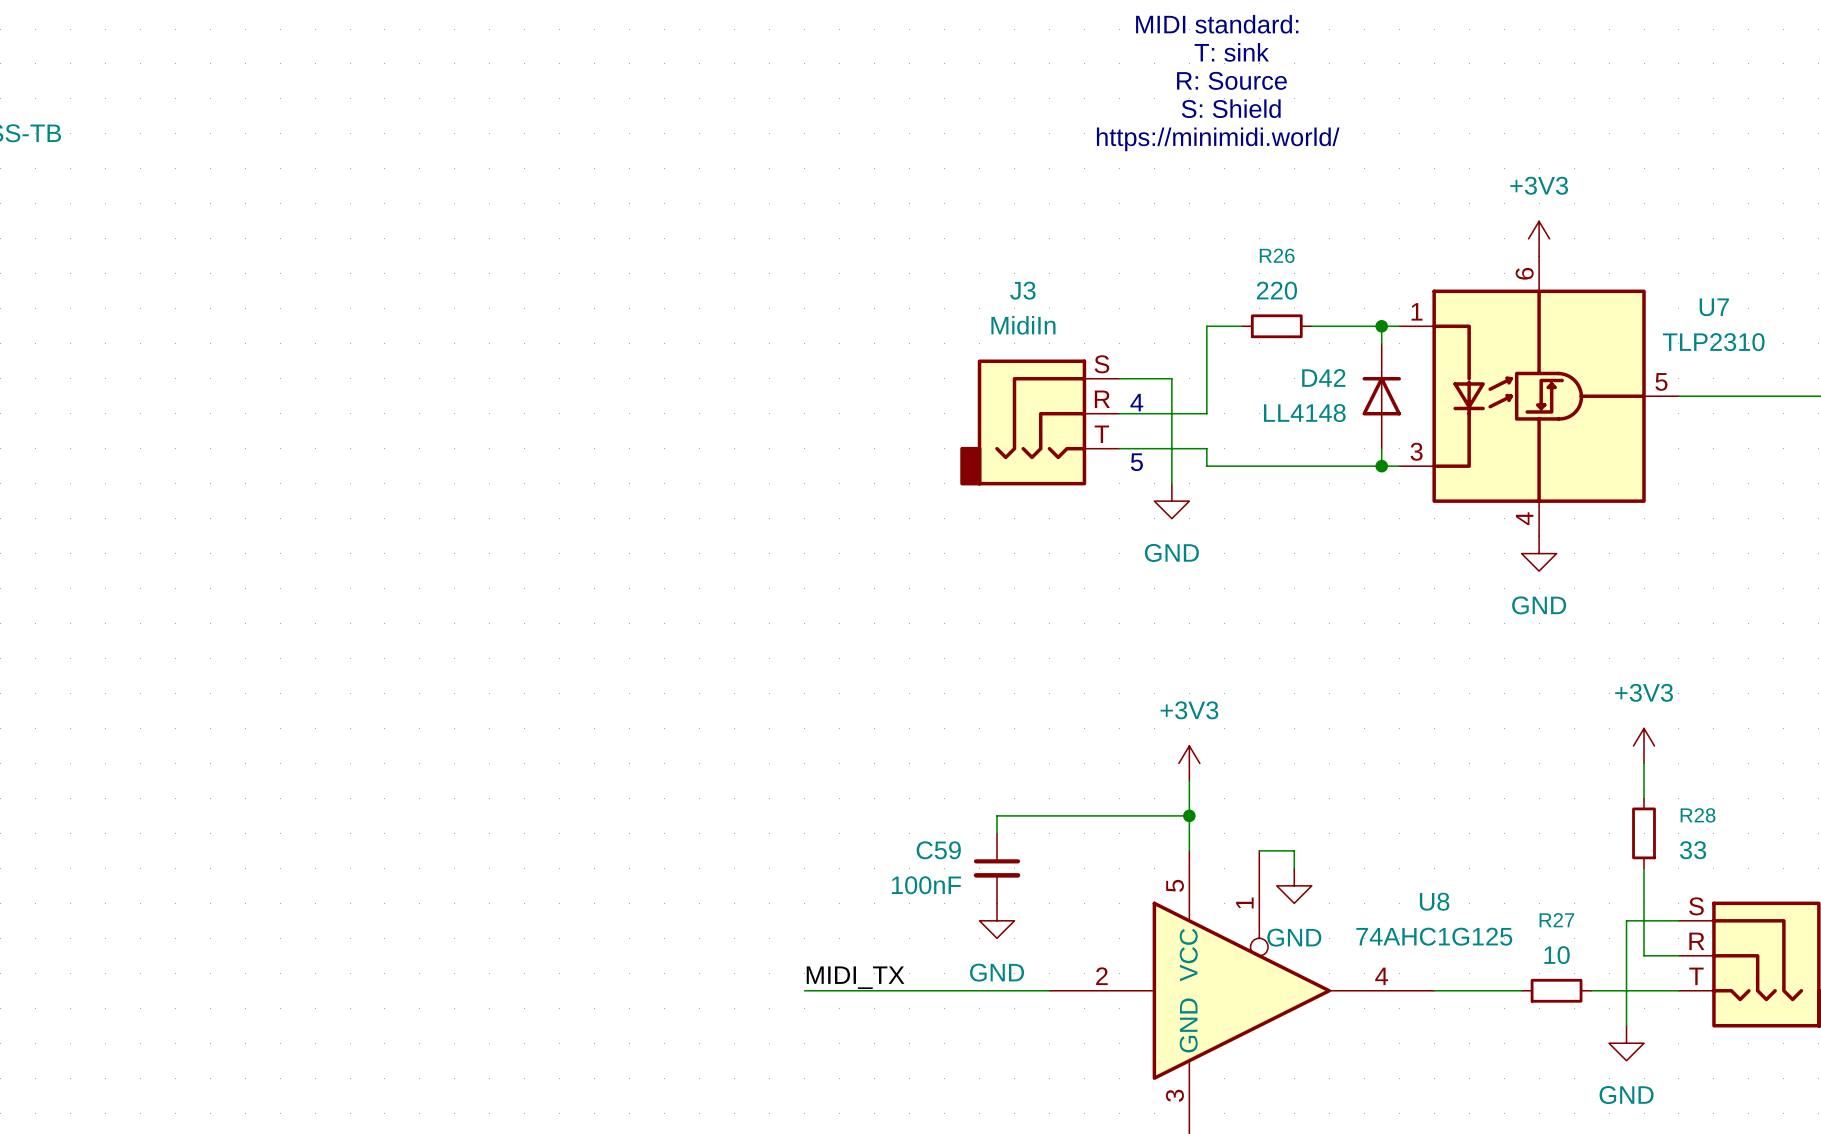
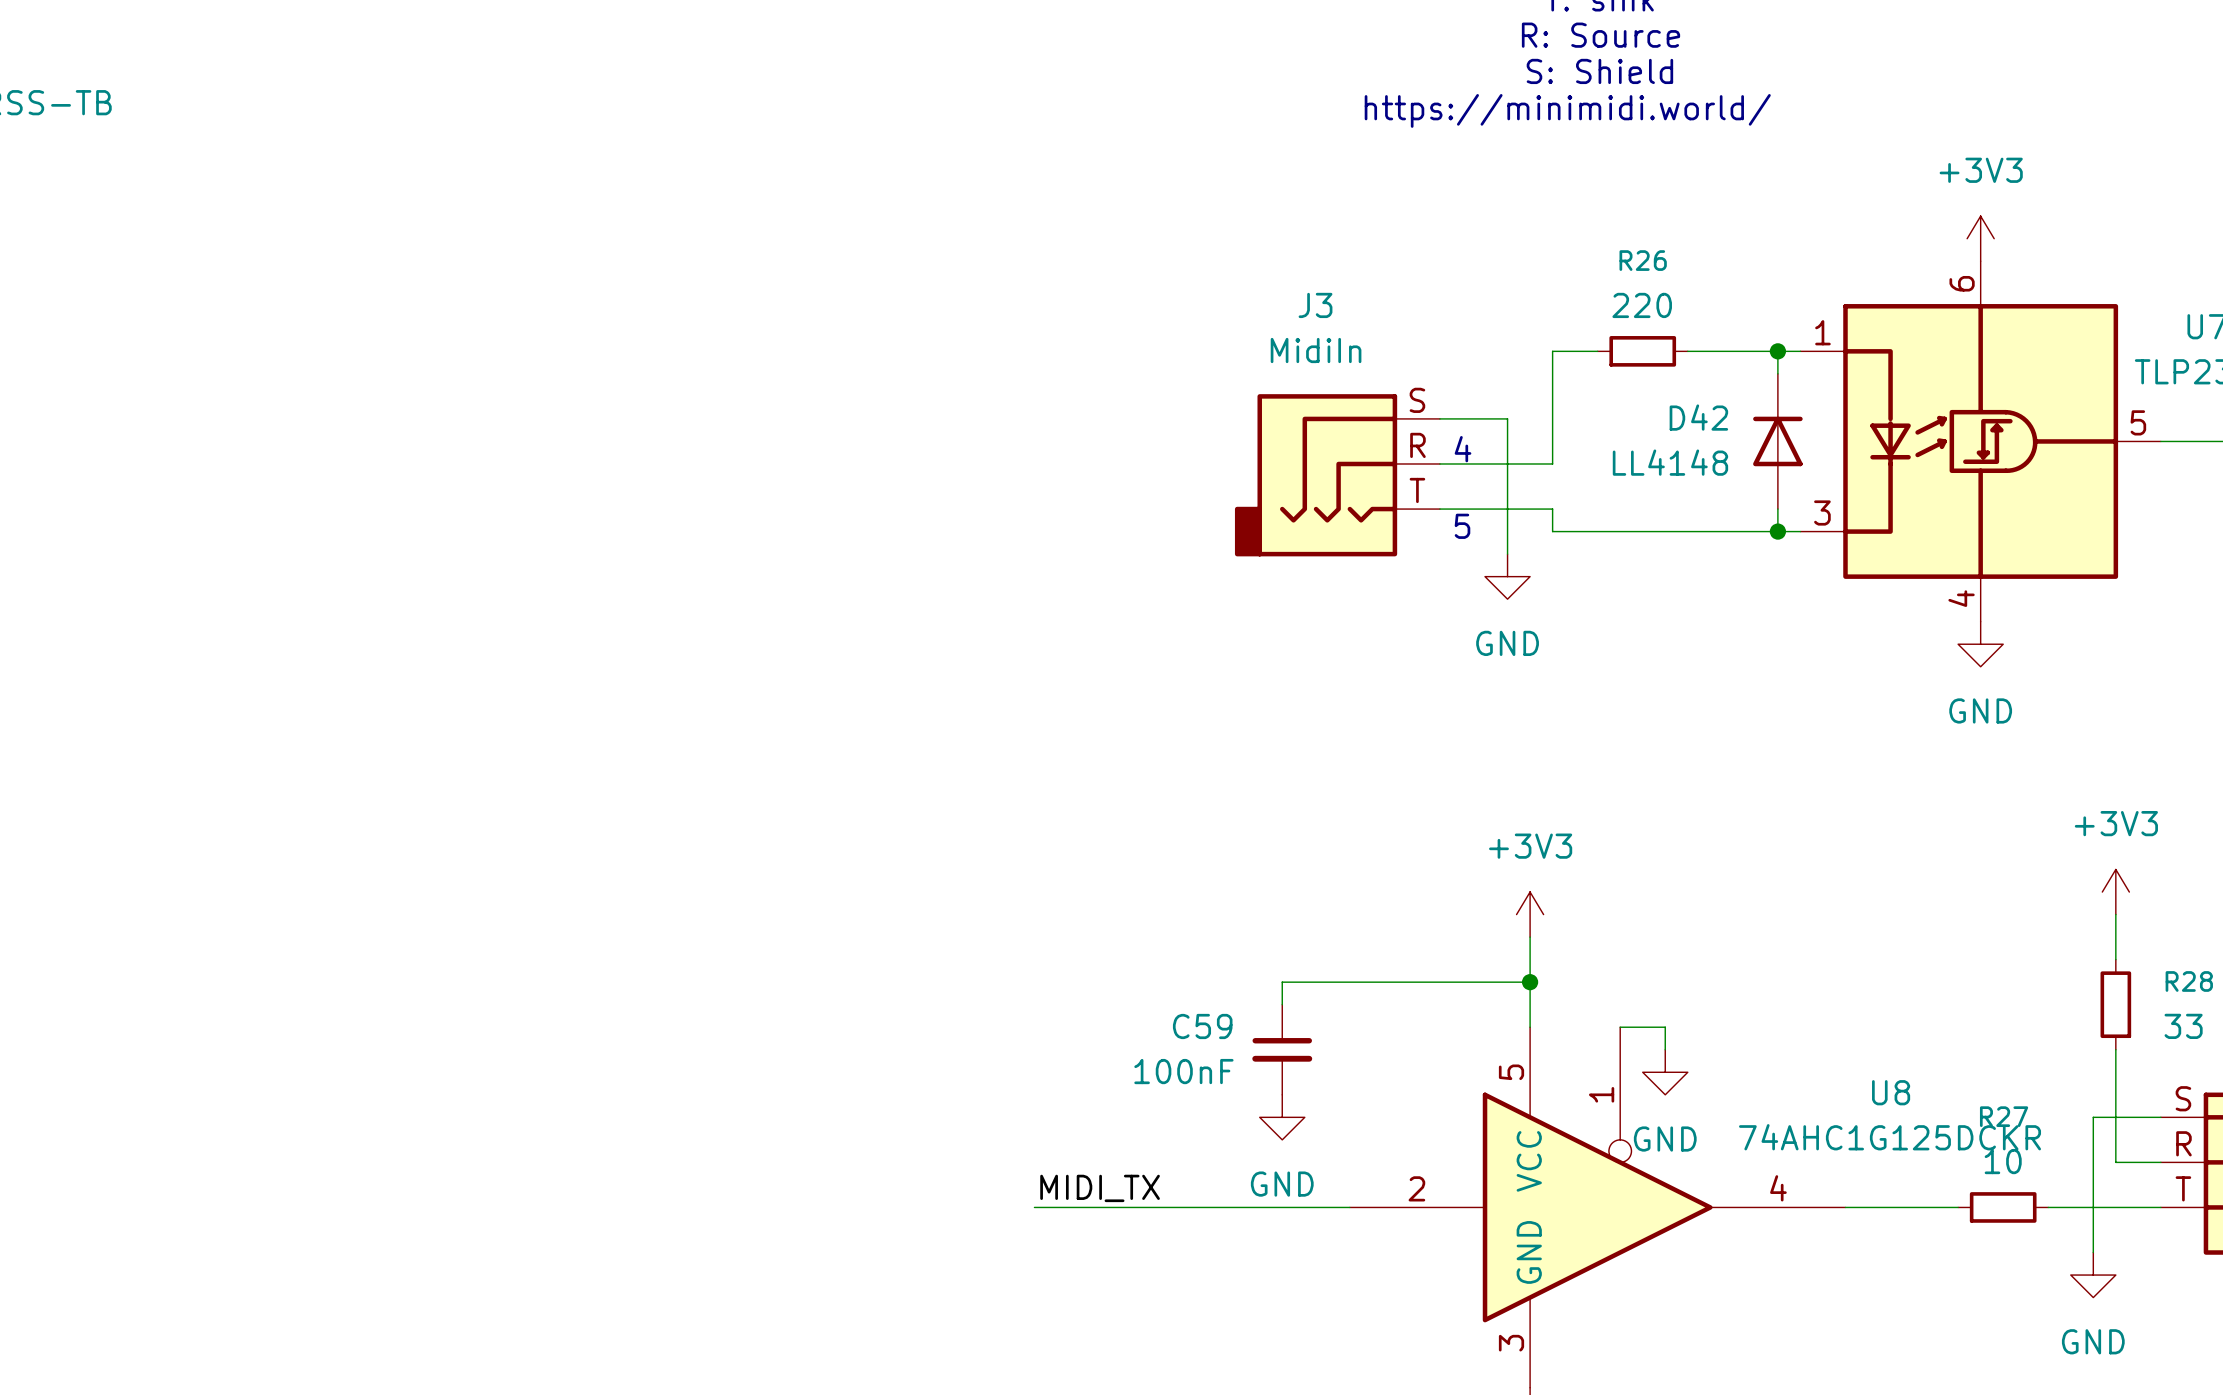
U8 name position: U8 (1434, 901) -> U8 (1891, 1092)
U8 value: 74AHC1G125 (1434, 936) -> 74AHC1G125DCKR (1890, 1137)

